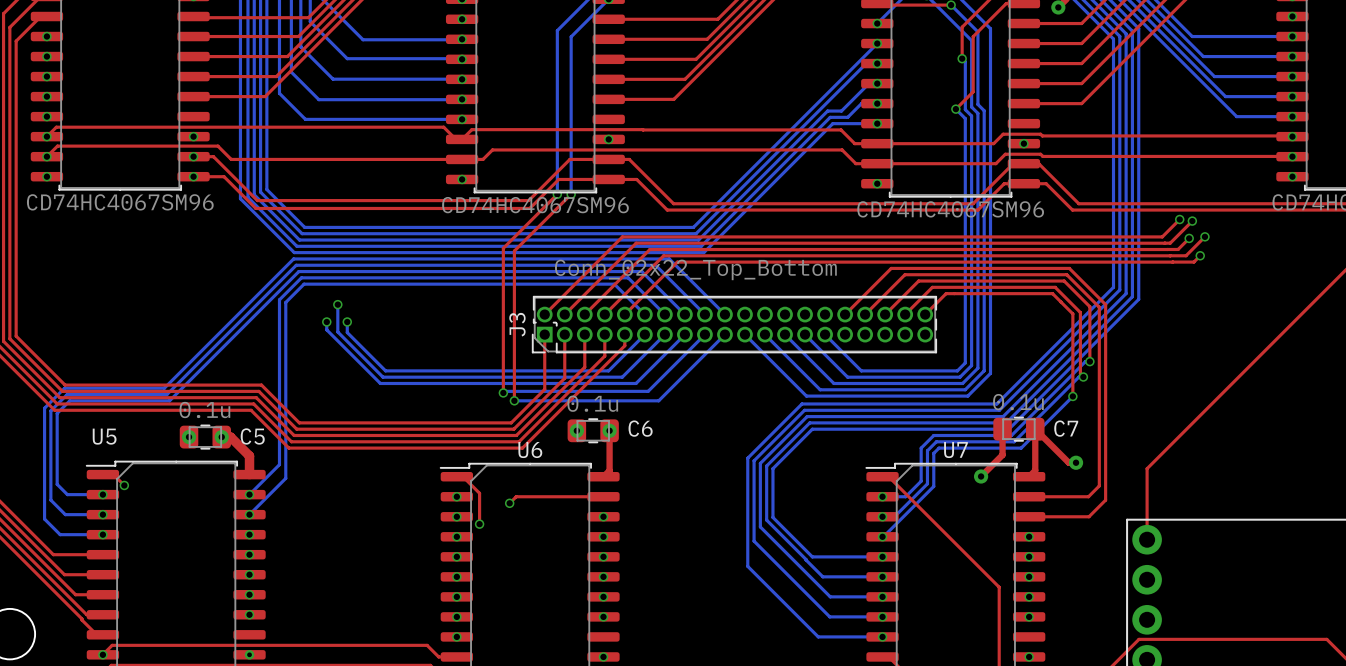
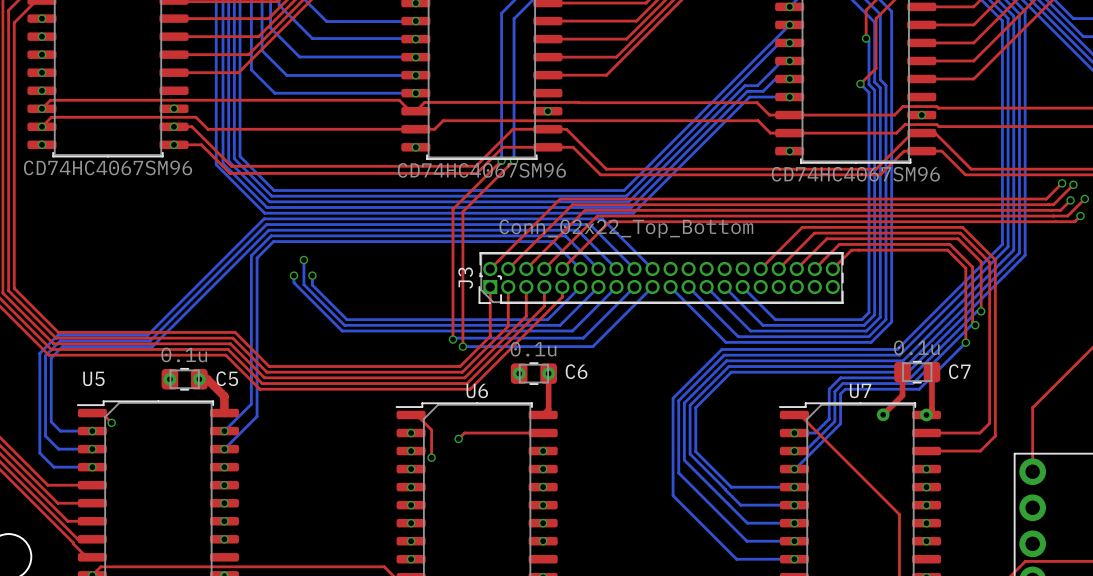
top track: (1035, 429) (1068, 462) (1076, 462) -> none
via position: (1076, 462) -> (926, 414)

